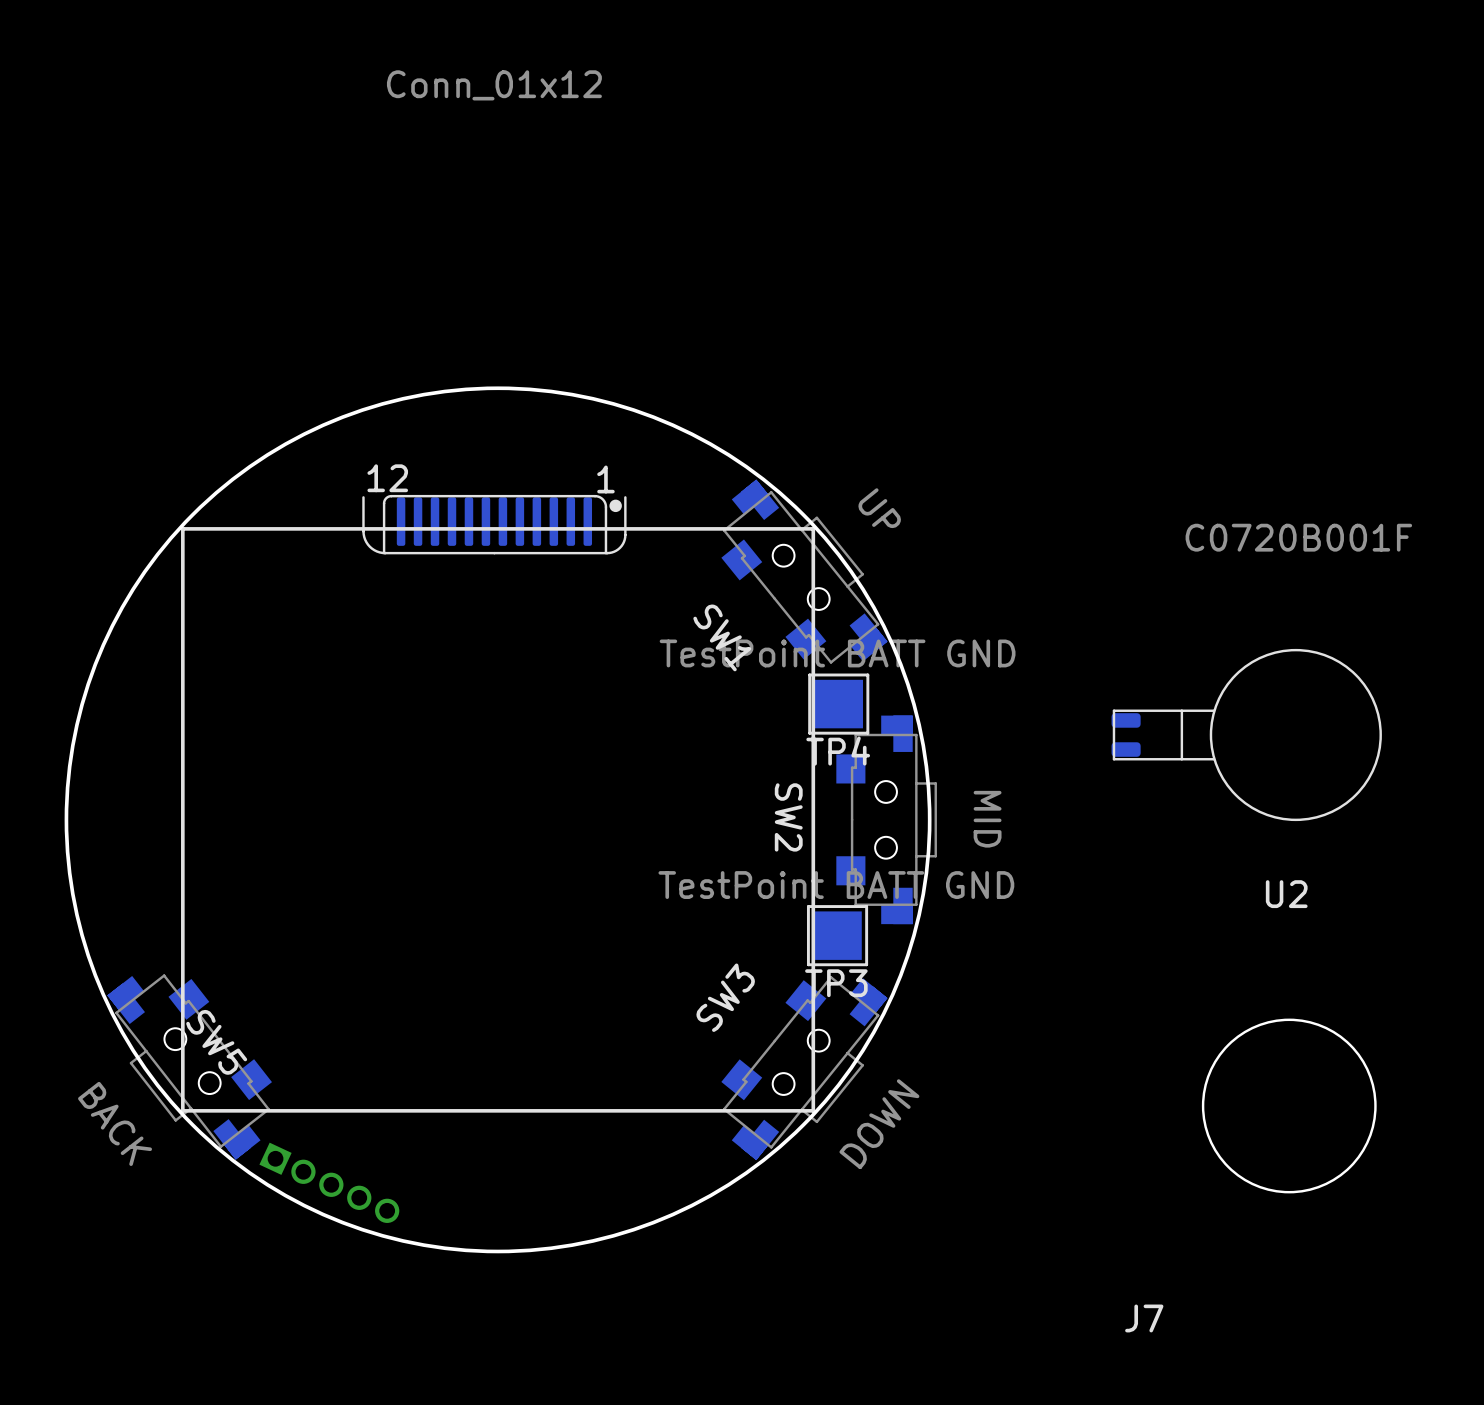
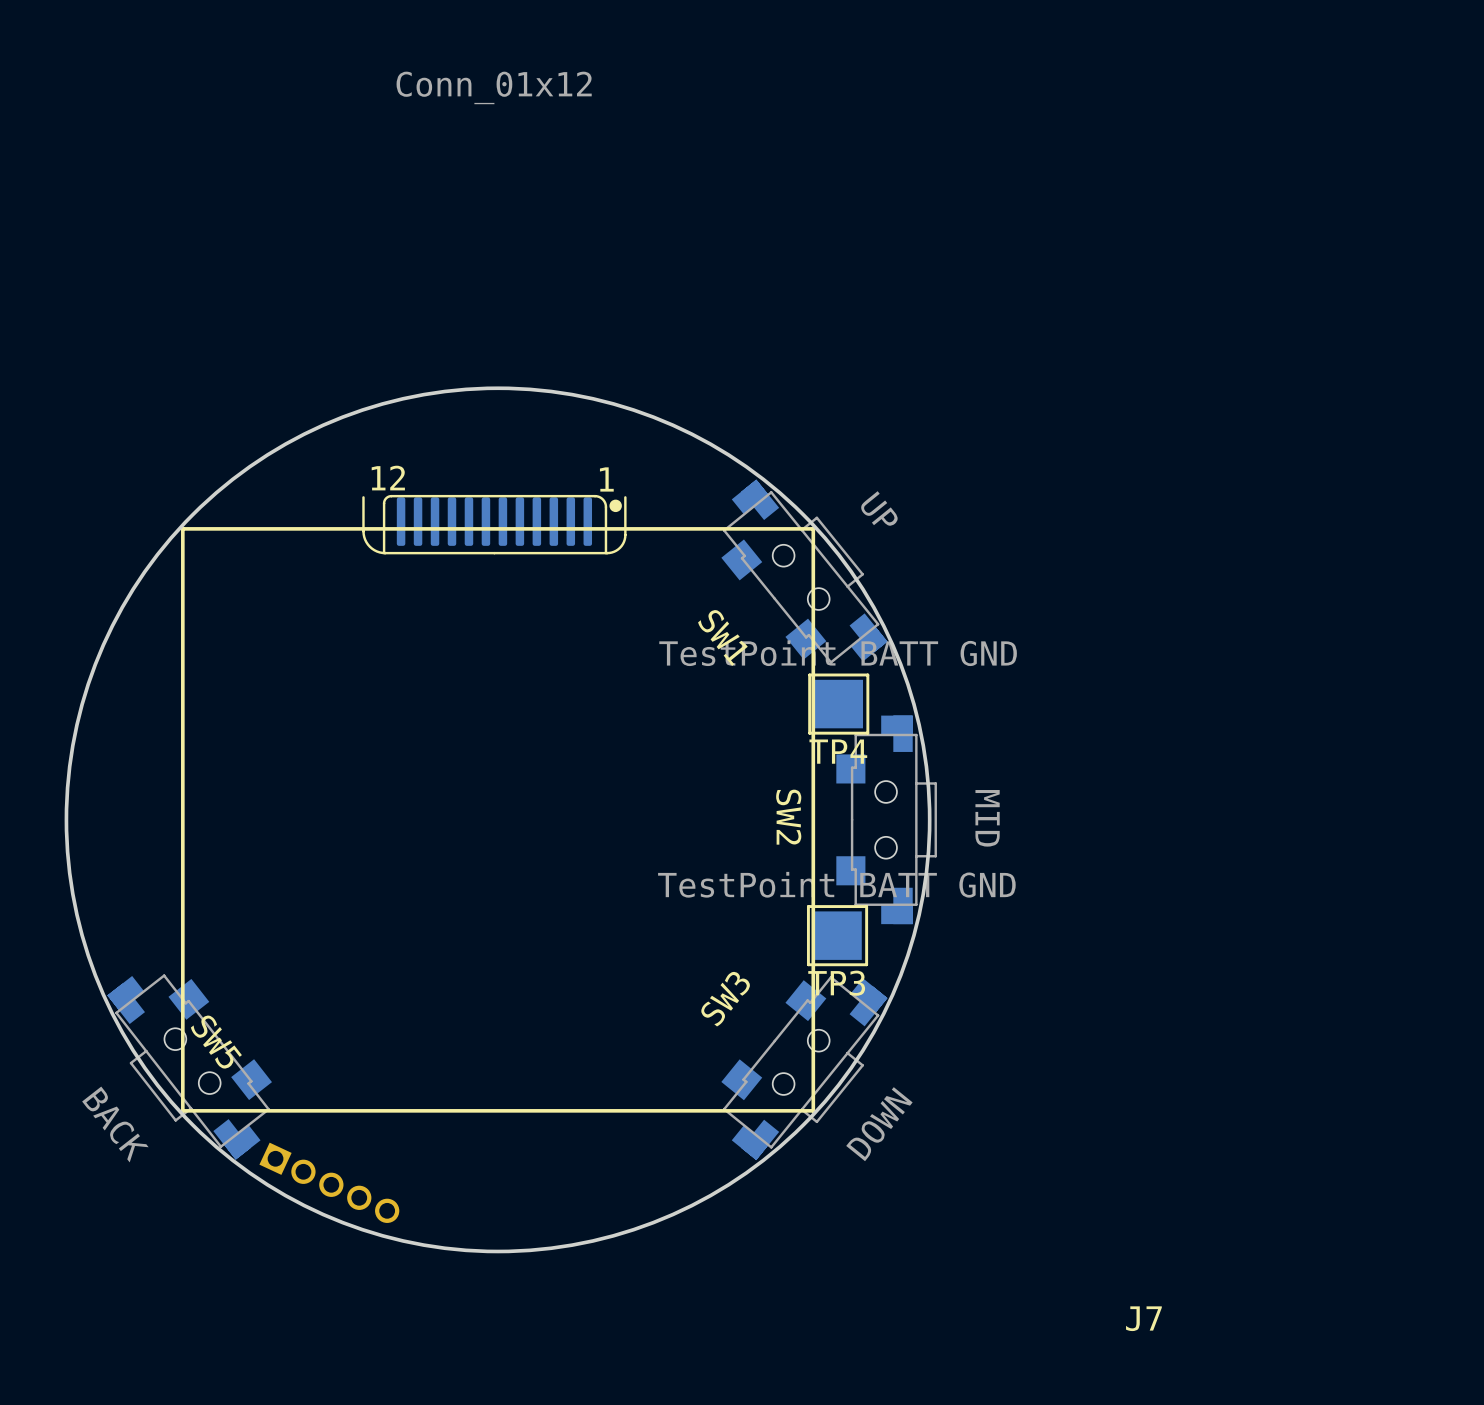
U2: C0720B001F (1246, 734) -> none
round board edge: [1201, 1018, 1377, 1194] -> none

